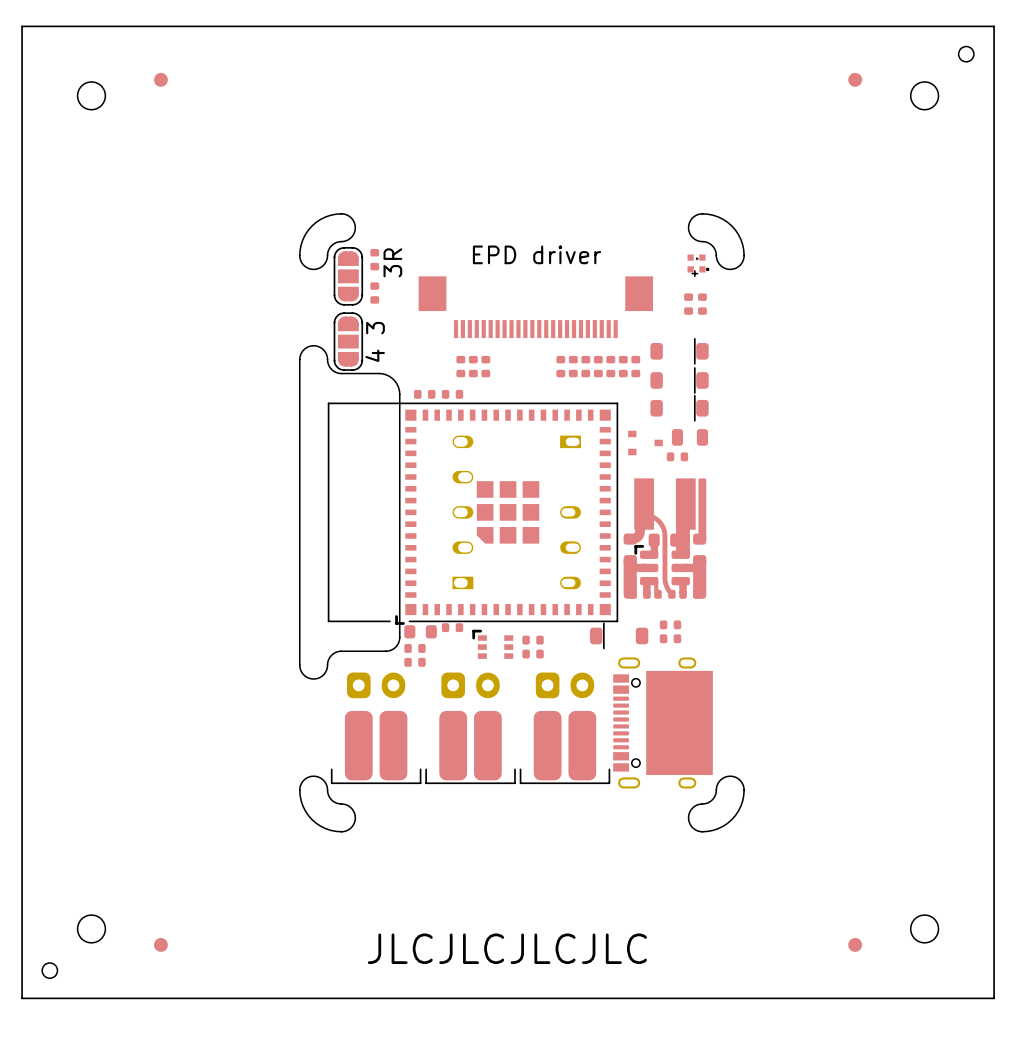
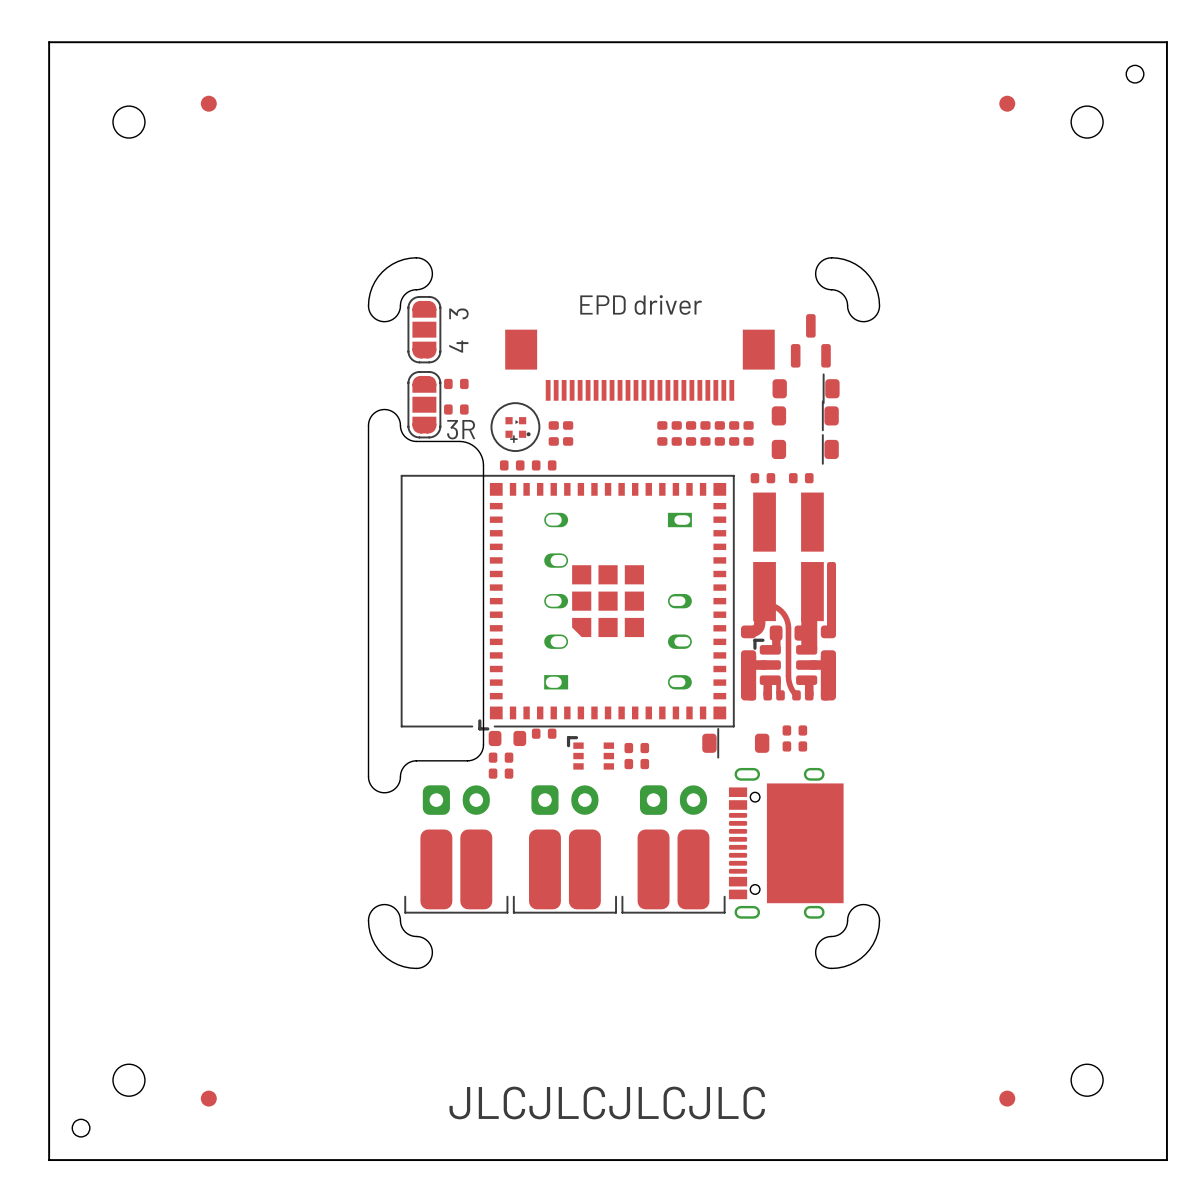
part: (374, 259) -> none
text rotation: 0° (392, 262) -> 90° clockwise (461, 429)
text position: 3R (392, 262) -> 3R (461, 429)
part position: (698, 265) -> (518, 430)
part: none -> (810, 340)
part: (374, 293) -> none
part: (688, 304) -> none
part: (702, 304) -> none
part: none -> (456, 383)
part: none -> (806, 388)
text position: 3 (375, 328) -> 3 (458, 313)
drawing: none -> [490, 402, 541, 452]
part: none -> (456, 409)
text position: 4 (375, 355) -> 4 (458, 346)
part: (485, 366) -> none
part: none -> (662, 433)
part: (560, 366) -> none
part: none -> (676, 433)
part: (573, 366) -> none
part: none -> (691, 433)
part: (585, 366) -> none
part: none -> (705, 433)
part: (598, 366) -> none
part: none -> (719, 433)
part: (610, 366) -> none
part: none -> (734, 433)
part: (623, 366) -> none
part: none -> (748, 433)
part: (635, 366) -> none
part footprint: [650, 394, 709, 422] -> [788, 473, 814, 484]
part: none -> (762, 478)
part: (689, 437) -> none
part: (645, 442) -> none
part: none -> (788, 522)
part: (677, 456) -> none

